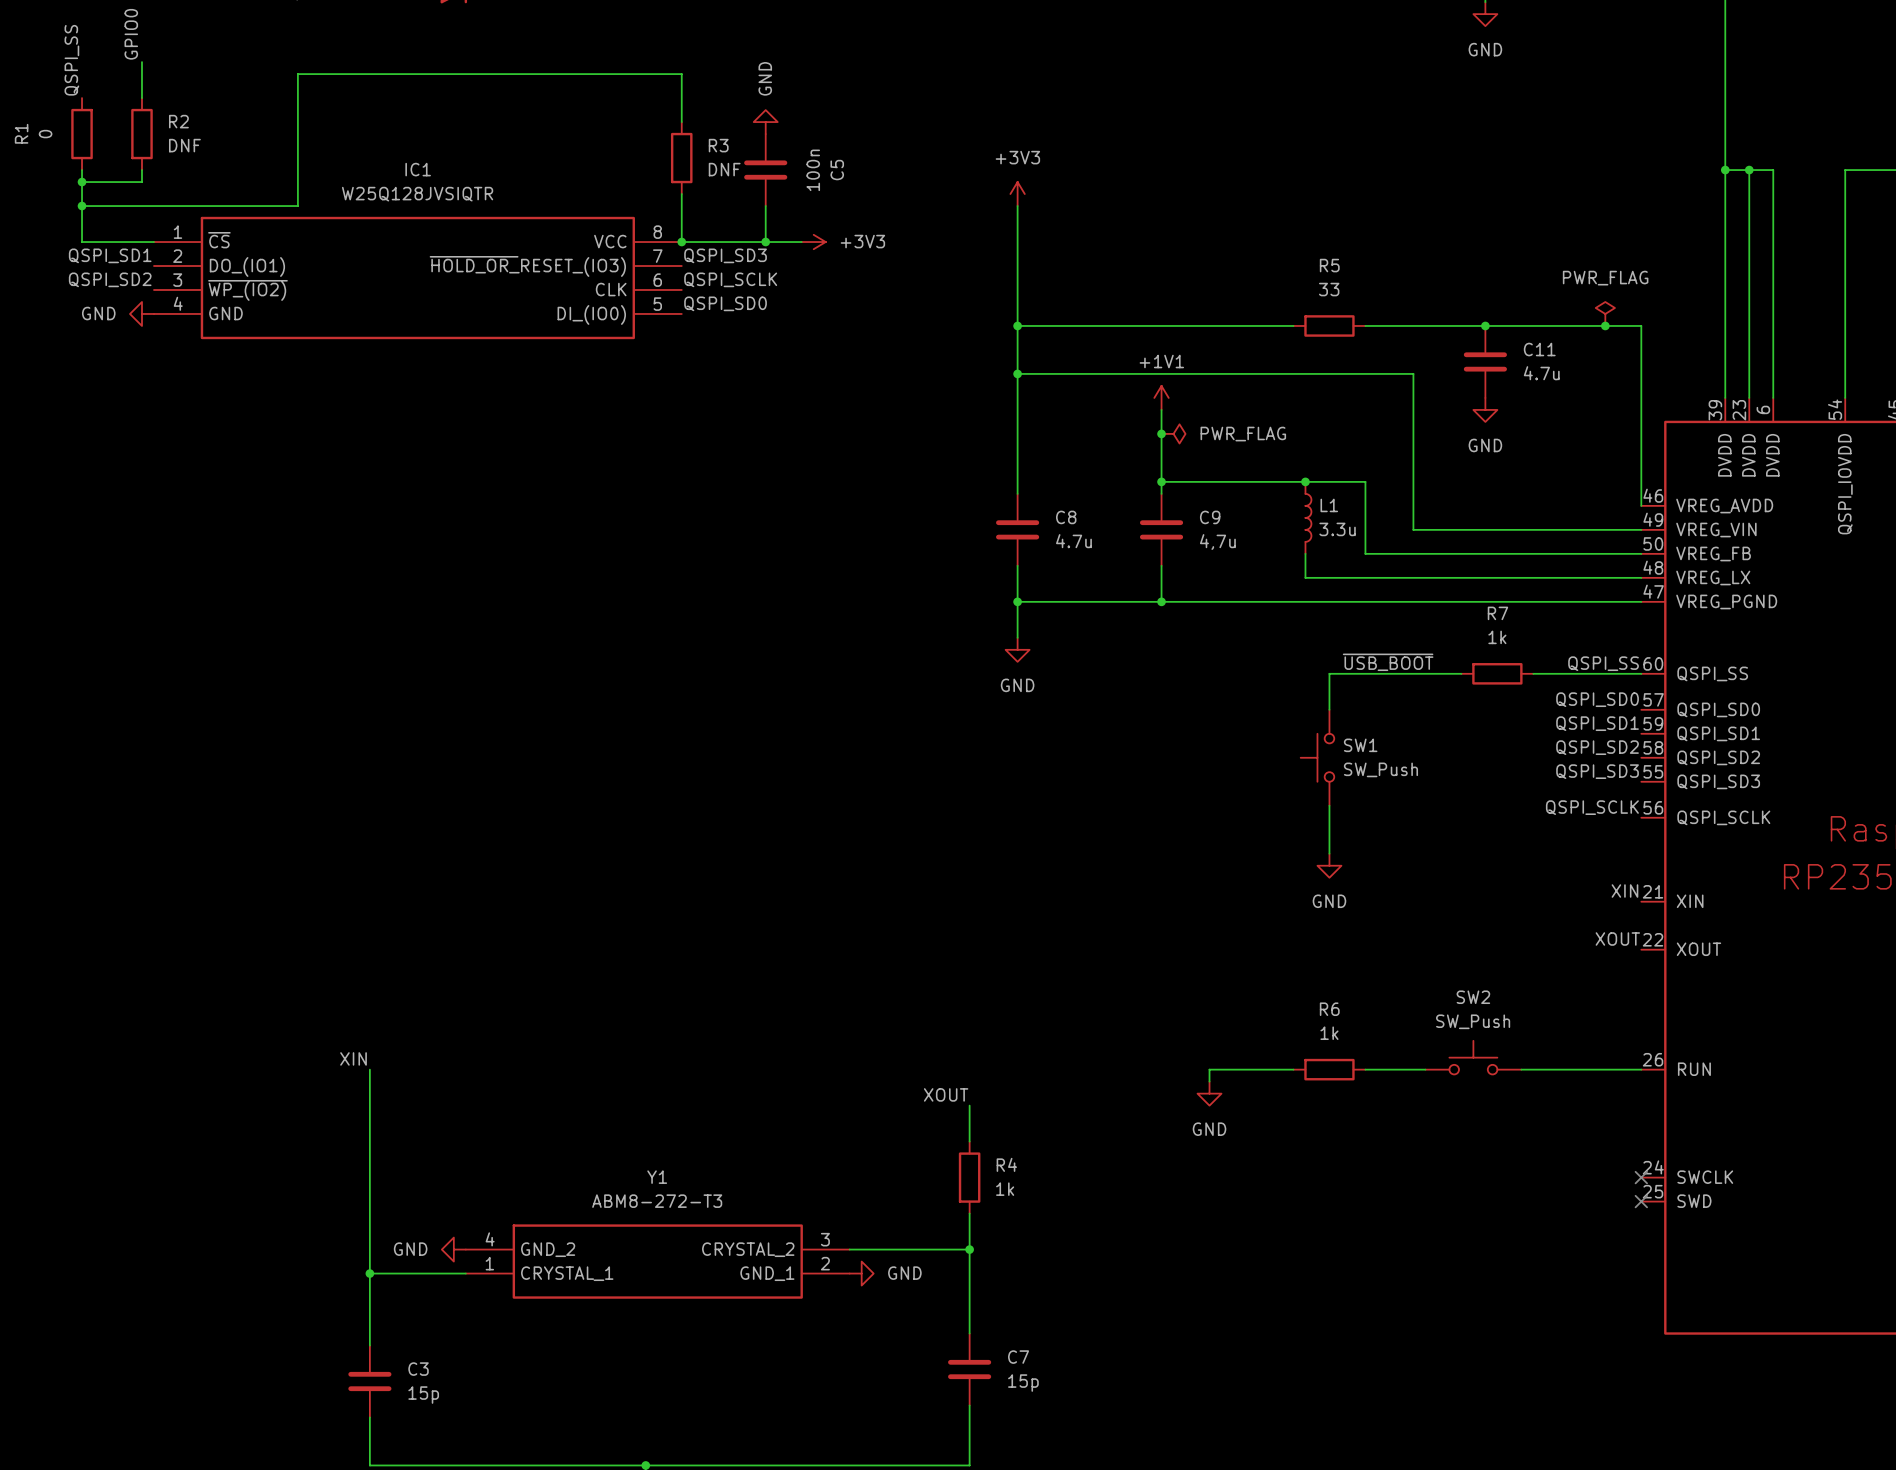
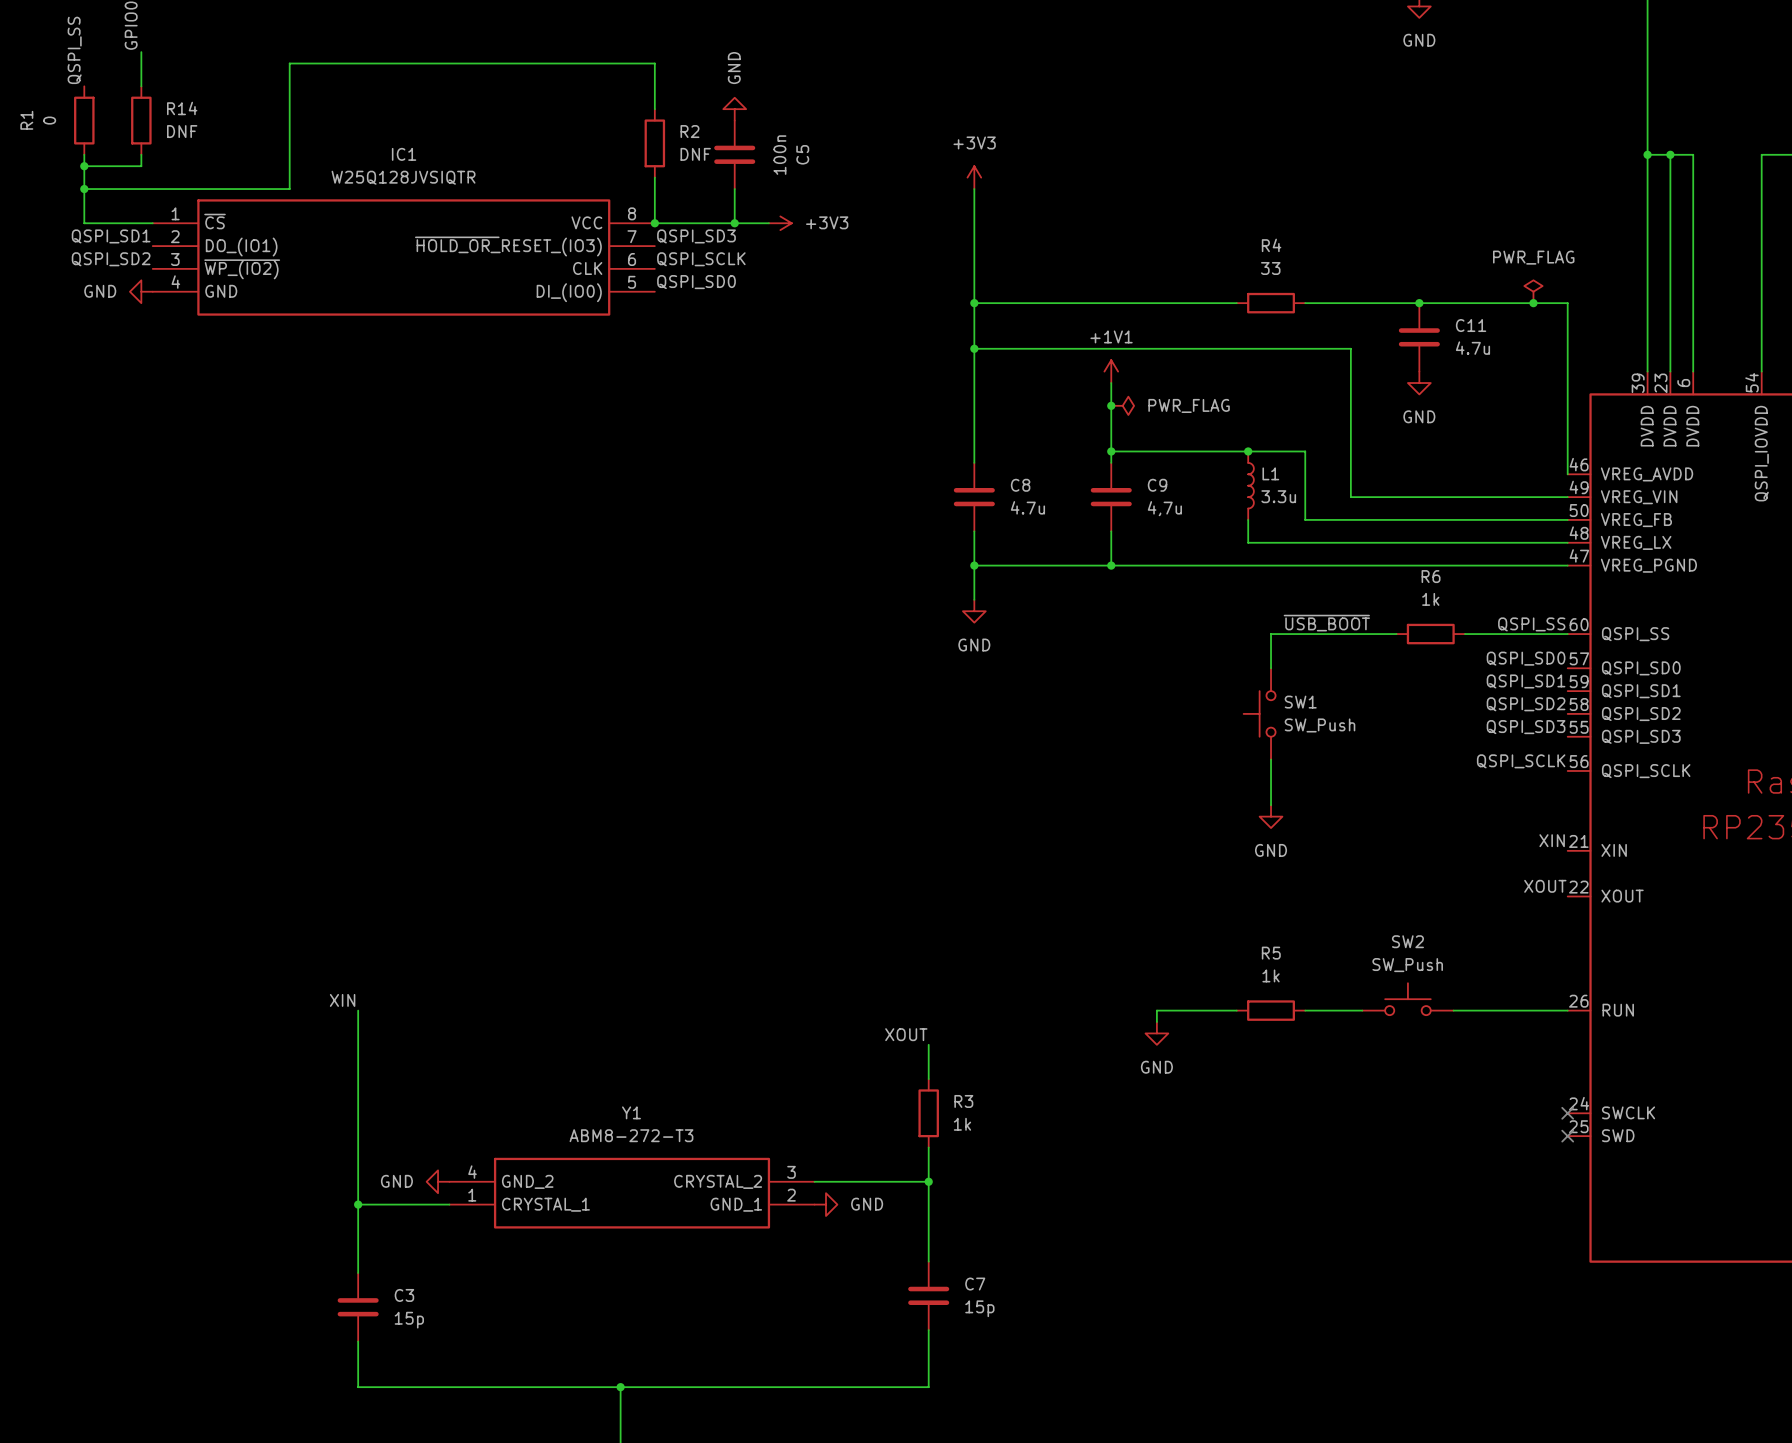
R2 name: R2 (178, 121) -> R14 (182, 108)
R3 name: R3 (718, 145) -> R2 (689, 131)
R5 name: R5 (1329, 265) -> R4 (1271, 245)
R7 name: R7 (1497, 613) -> R6 (1431, 576)
R6 name: R6 (1329, 1009) -> R5 (1271, 953)
R4 name: R4 (1006, 1164) -> R3 (963, 1101)

